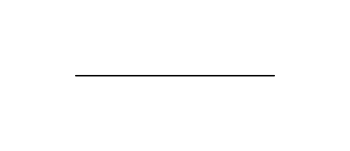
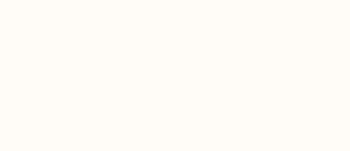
bus: (75, 75) (274, 75) -> none

